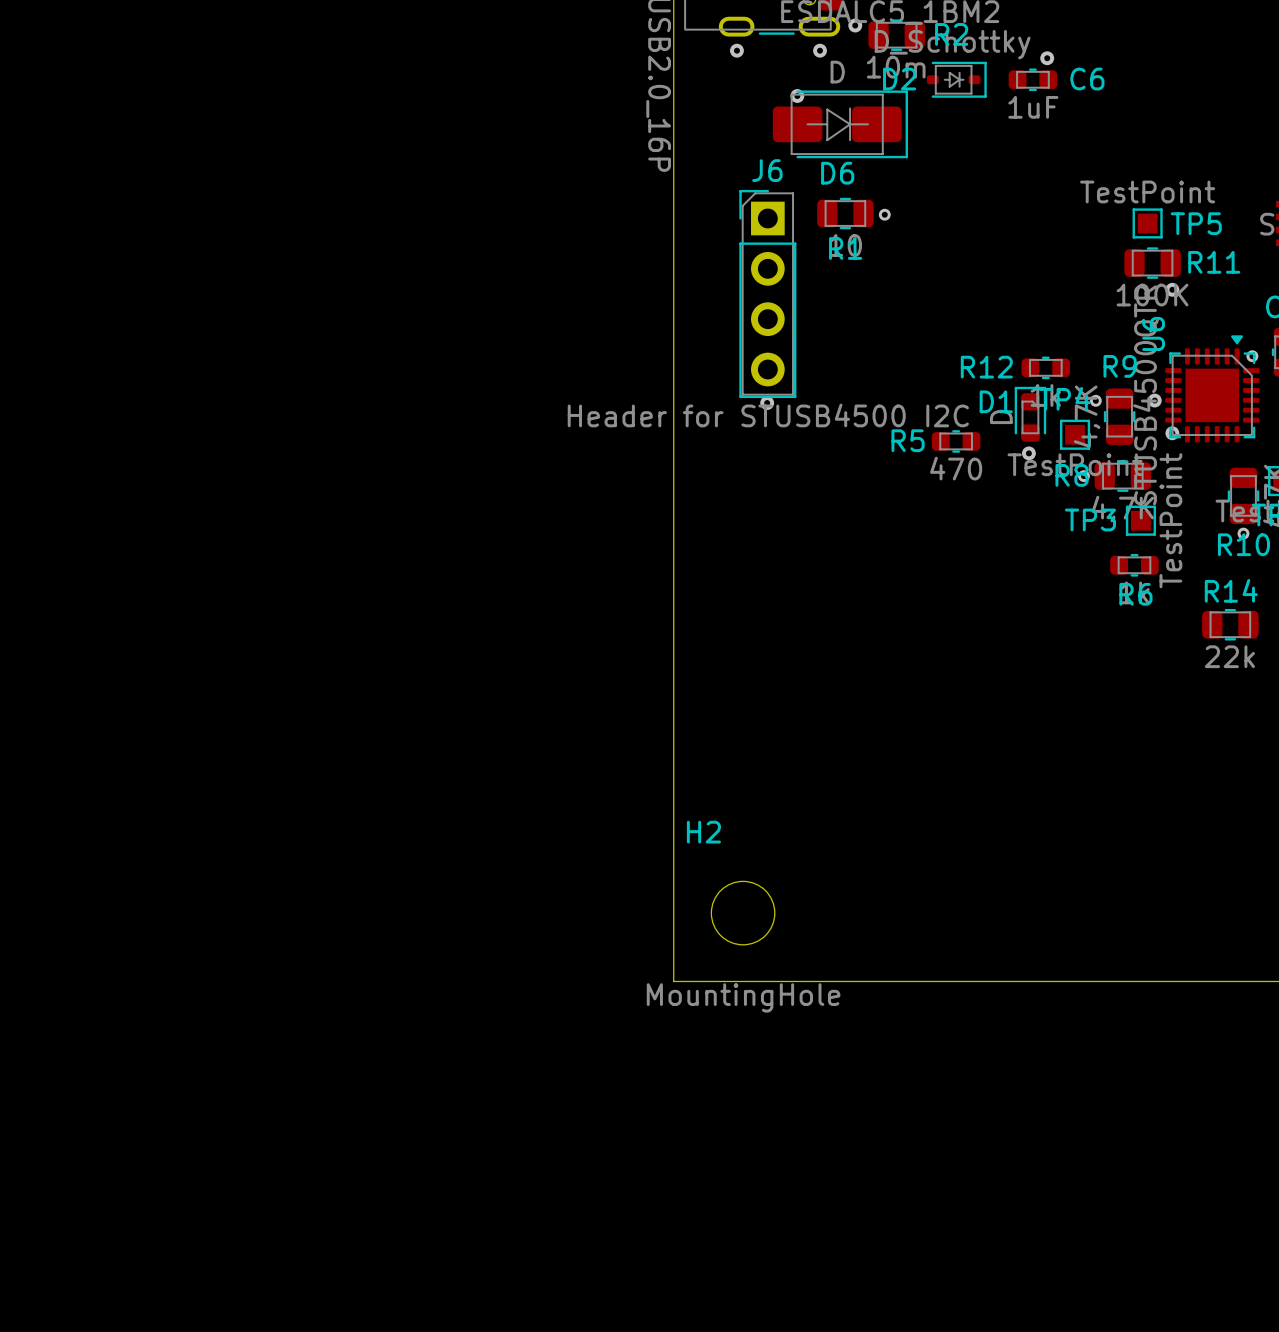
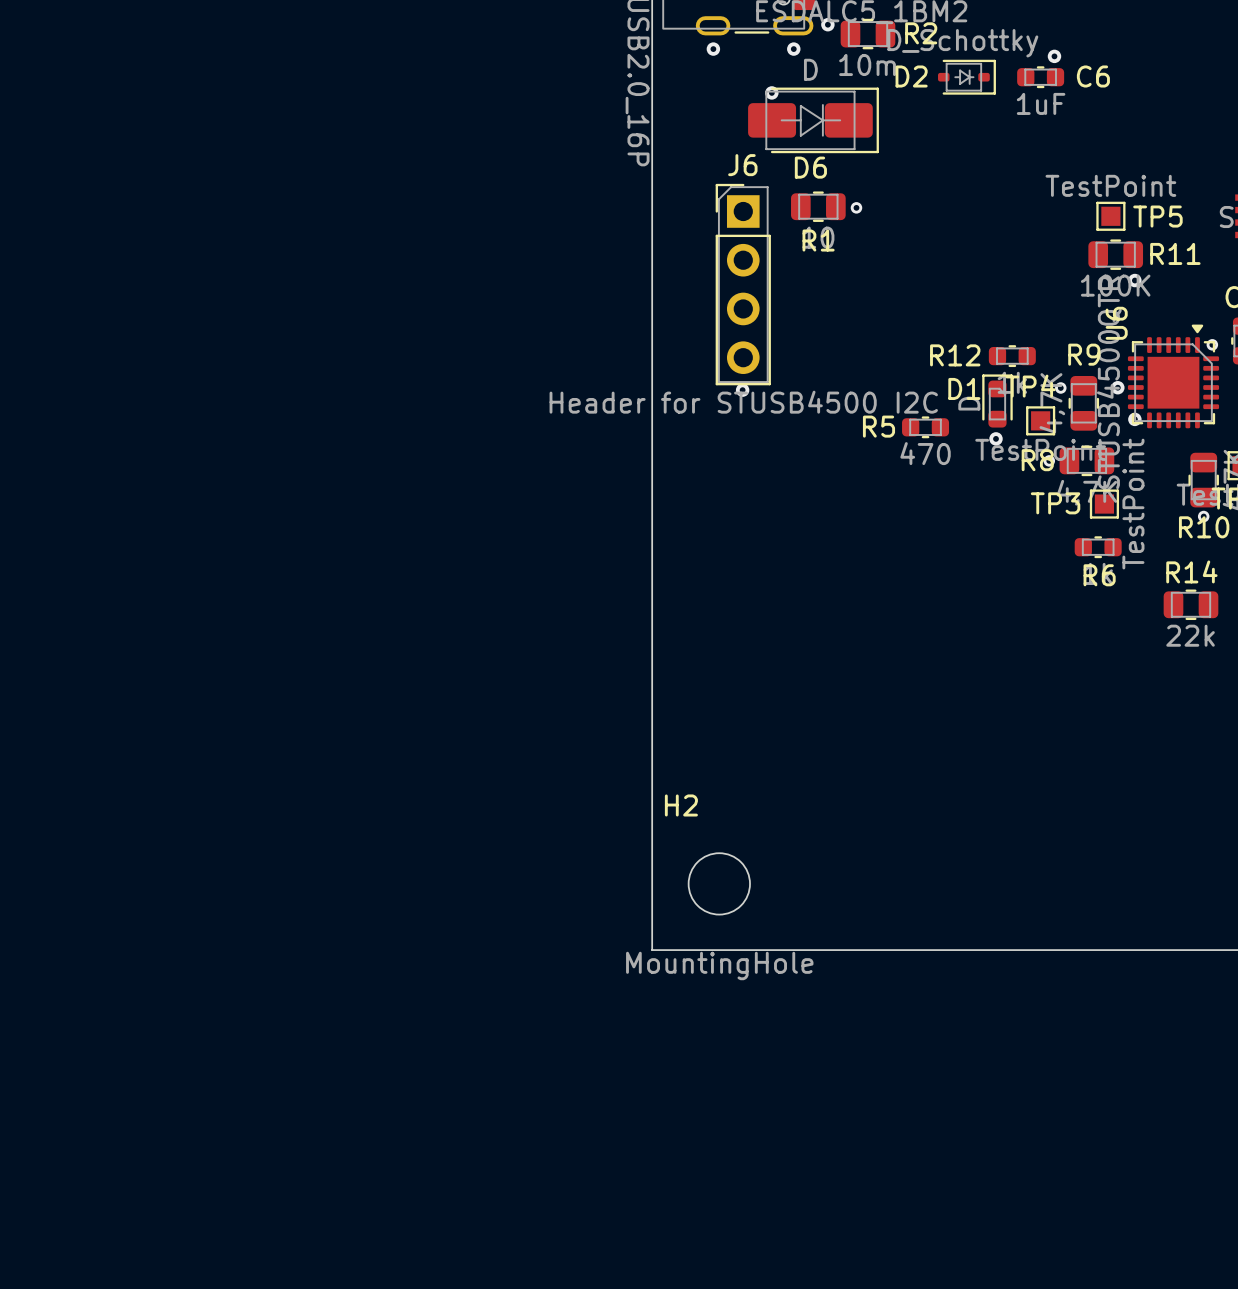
via position: (1047, 58) -> (1054, 56)
D2 position: (956, 79) -> (966, 77)
C6 position: (1032, 79) -> (1040, 77)

